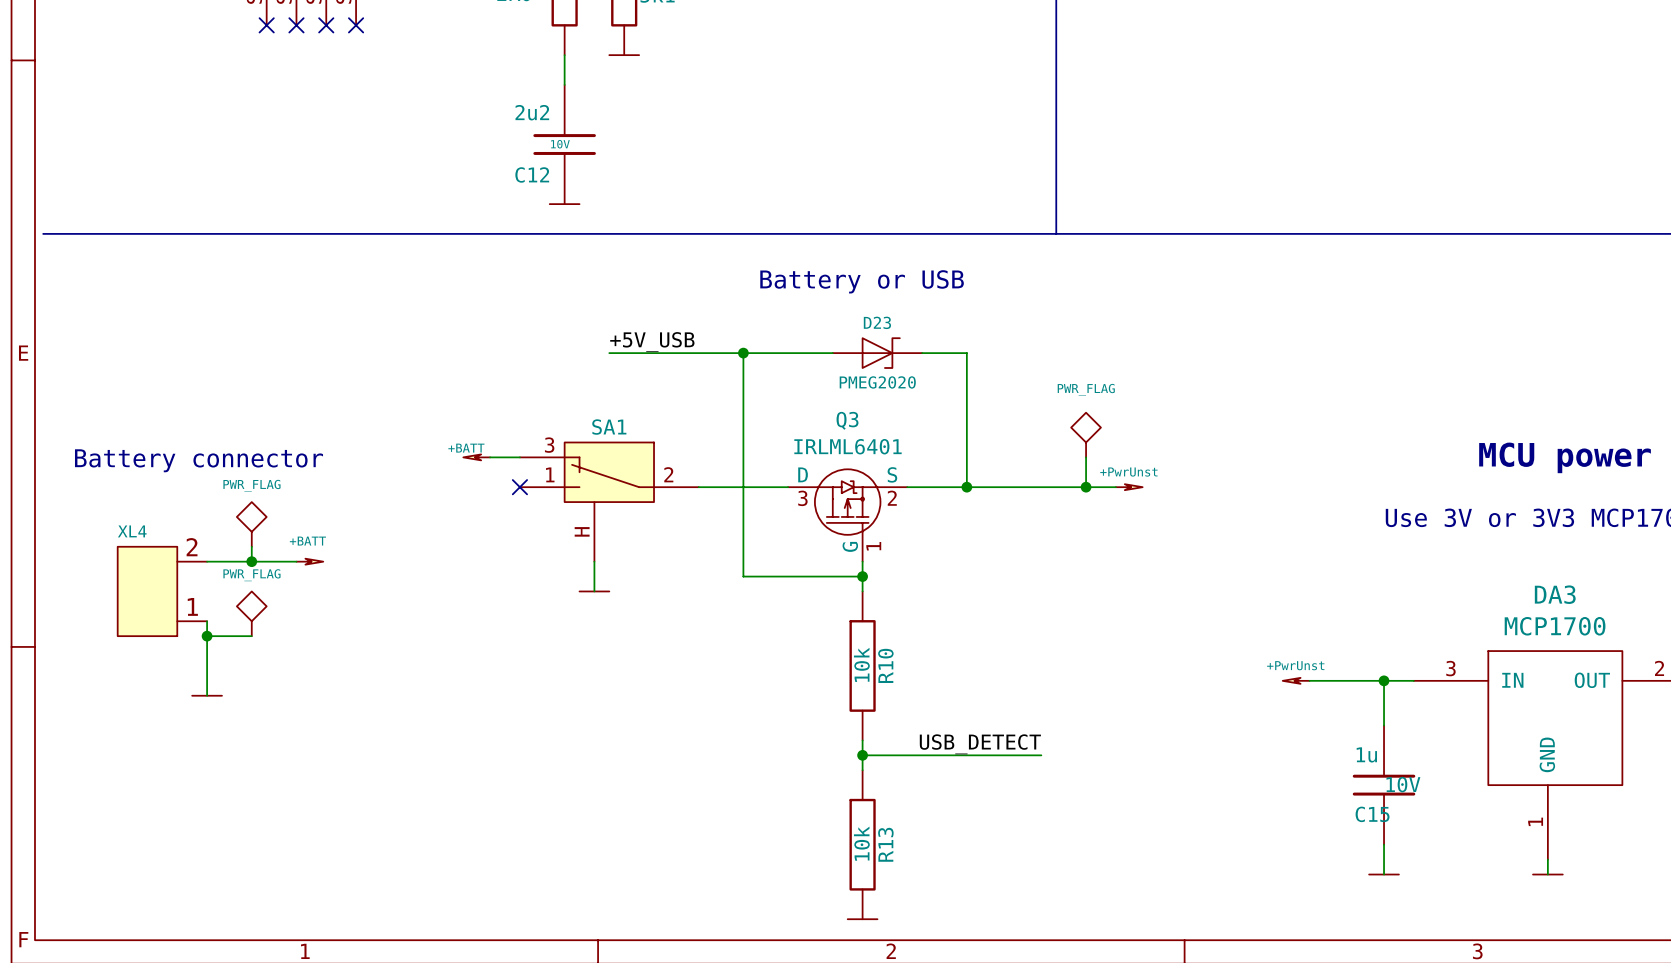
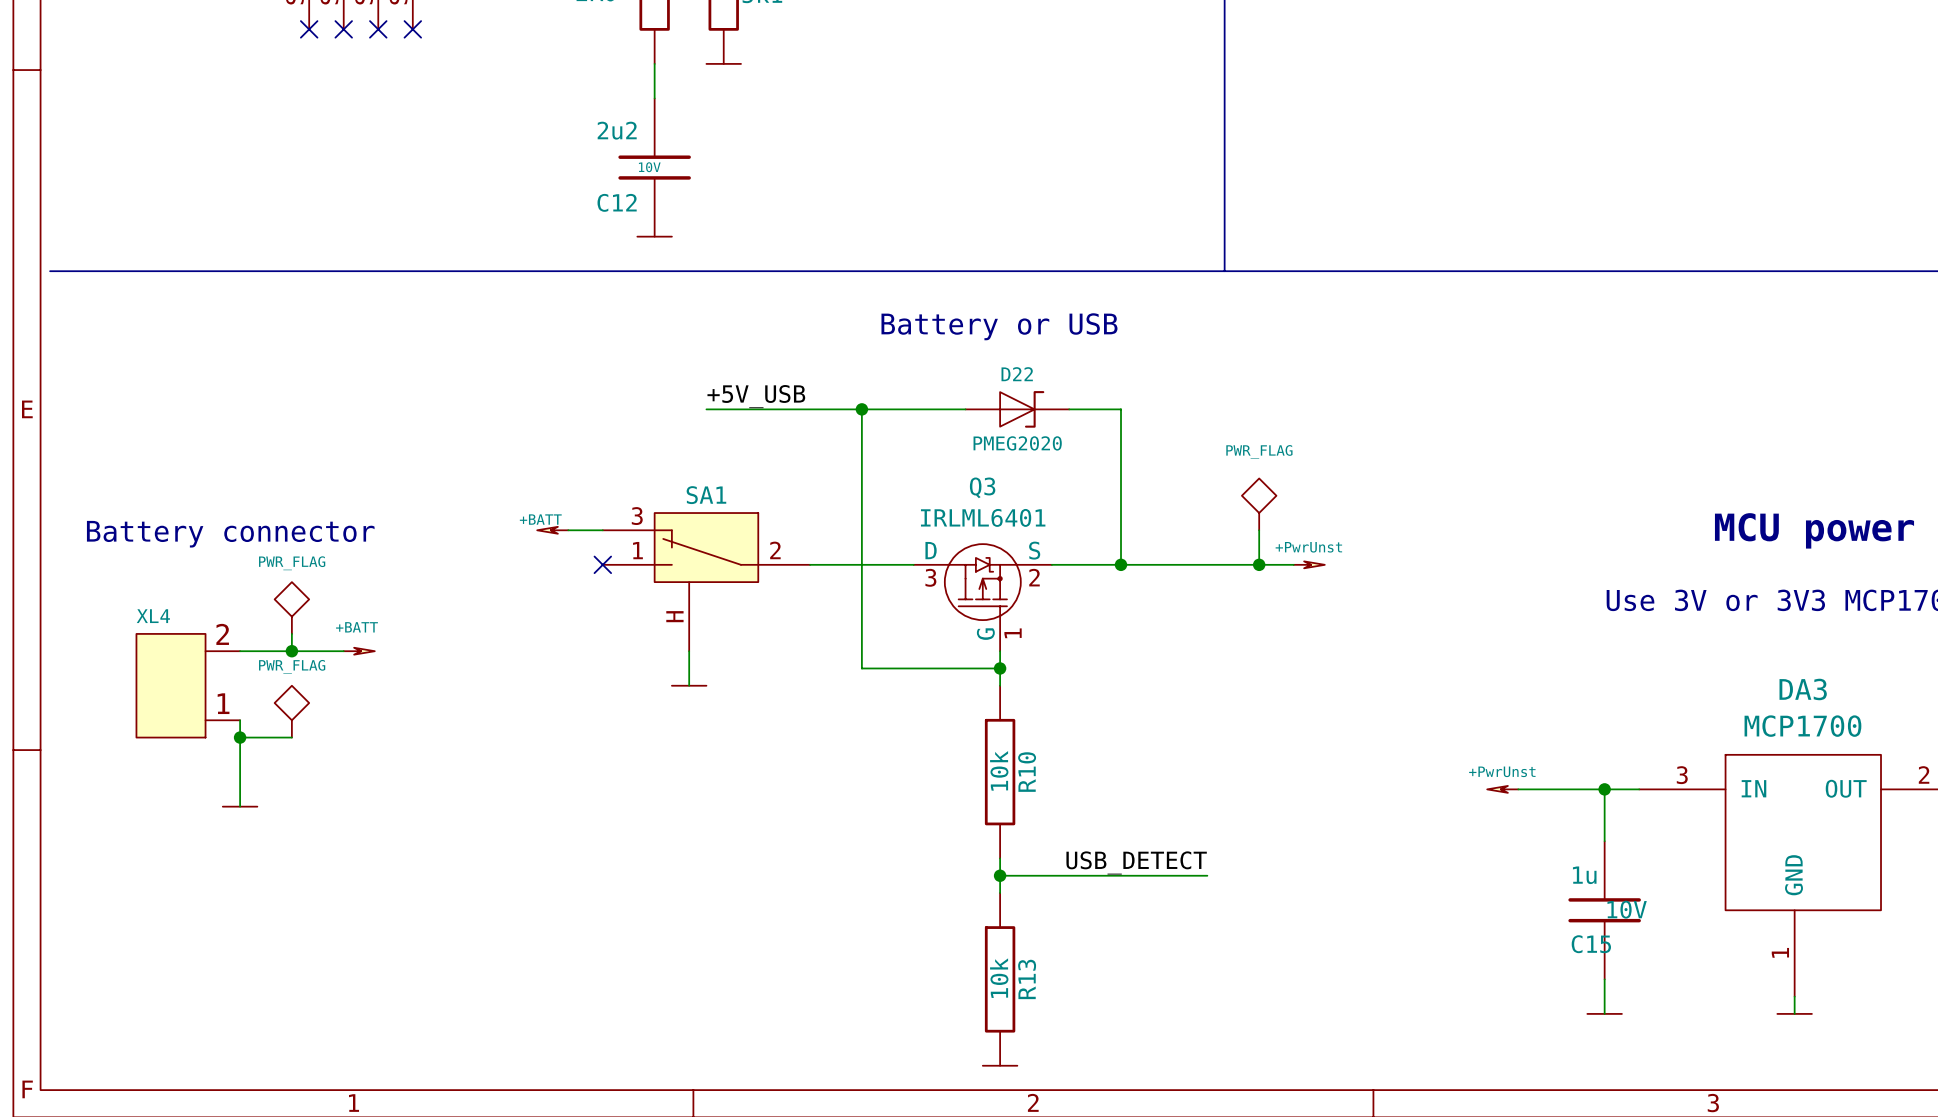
D23 name: D23 (877, 322) -> D22 (1017, 374)

